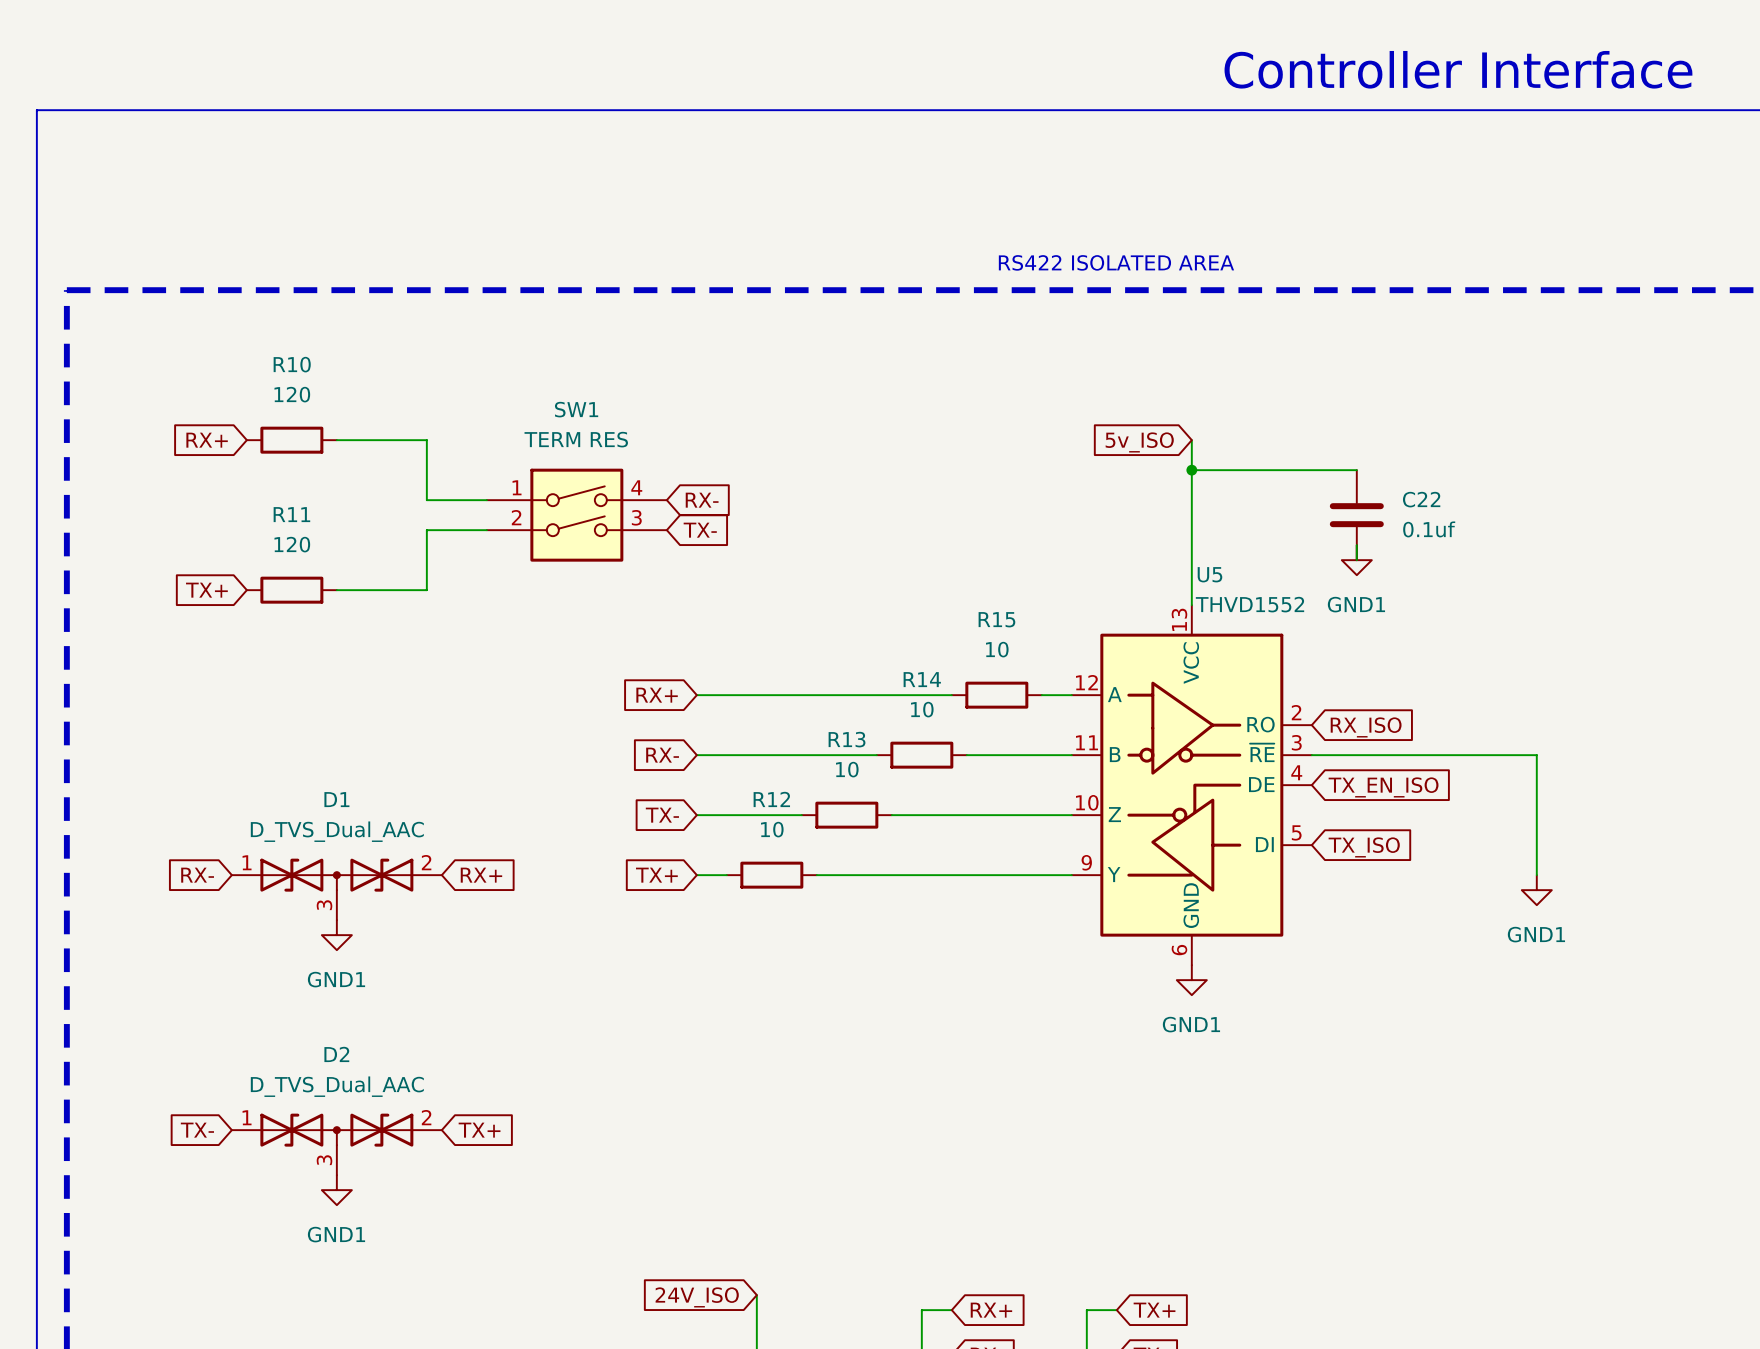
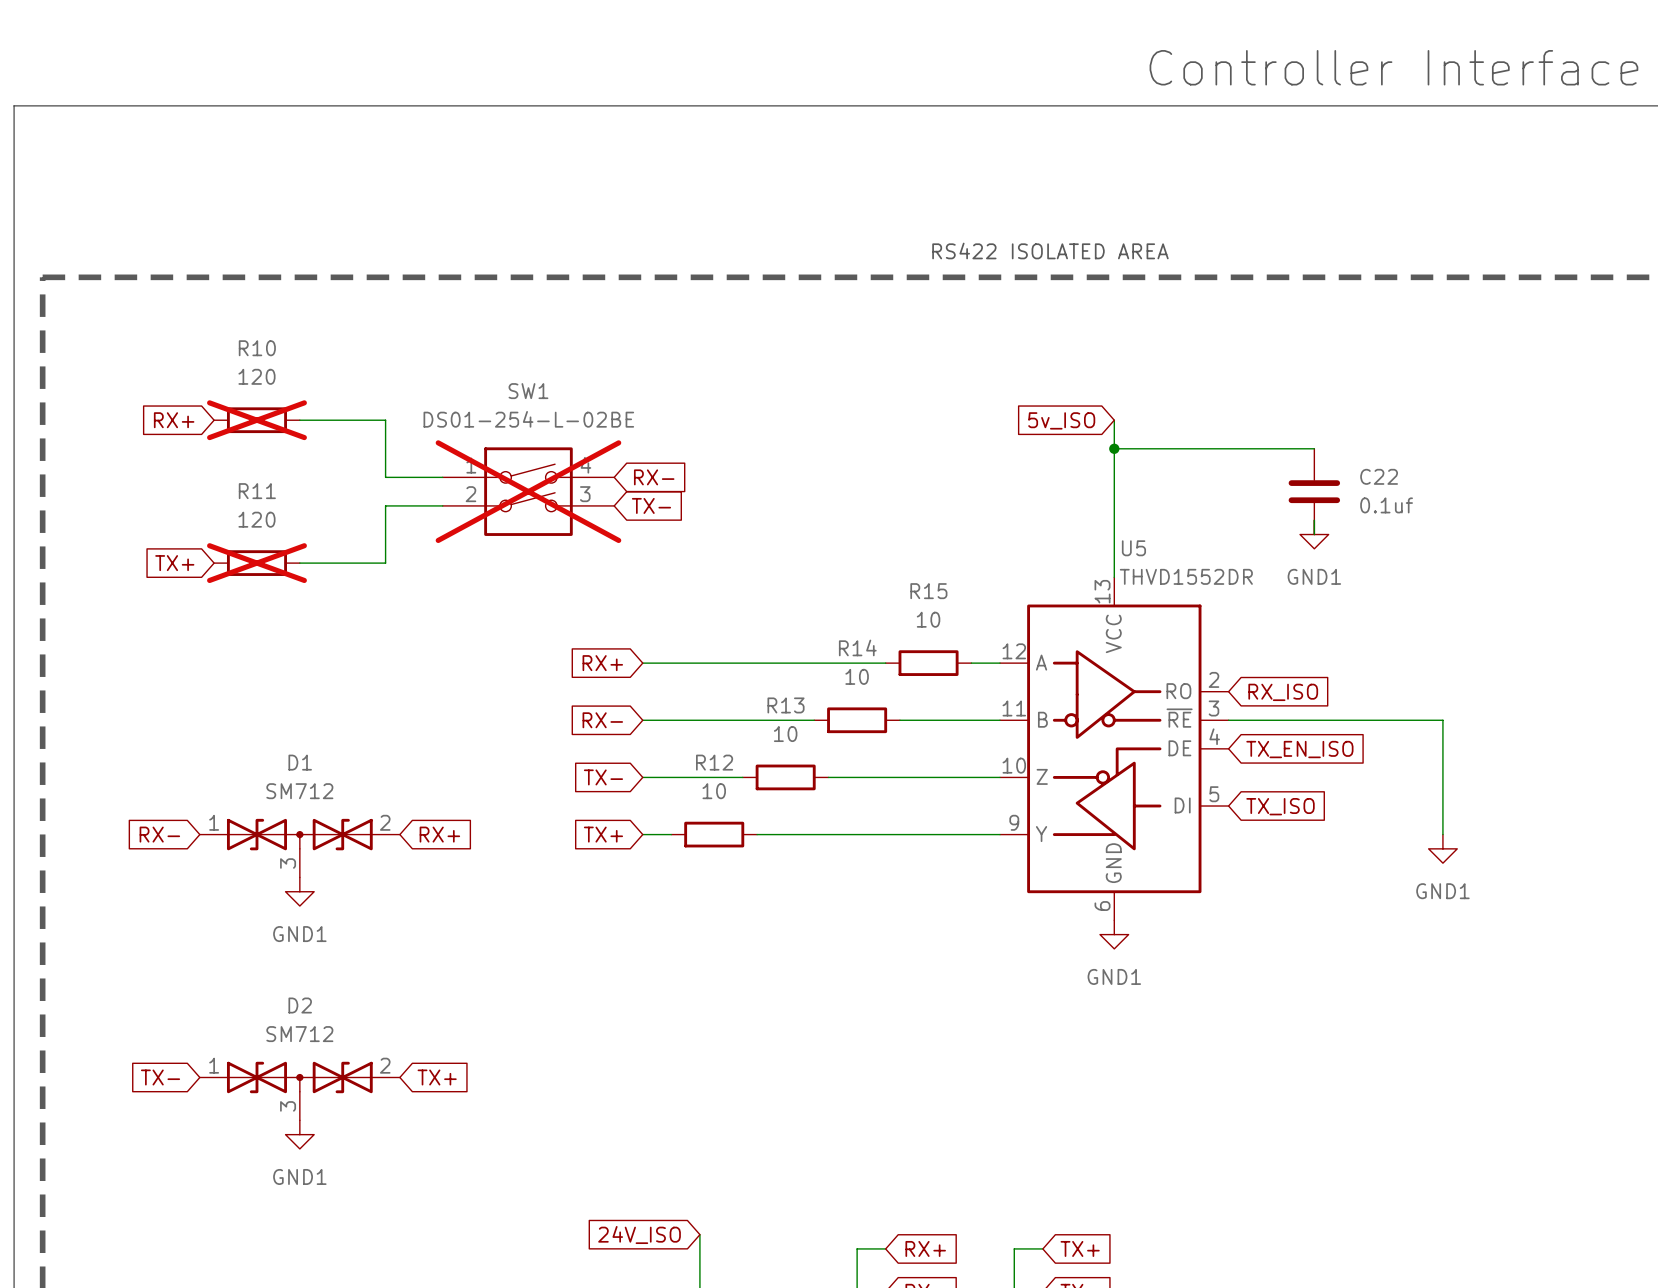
SW1 value: TERM RES (576, 439) -> DS01-254-L-02BE (528, 419)
R10 do-not-place cross: none -> (256, 420)
wire: none -> (1271, 448) (1314, 448)
SW1 do-not-place cross: none -> (528, 491)
C22 position: (1356, 515) -> (1314, 491)
wire: (1356, 545) (1356, 560) -> (1314, 520) (1314, 534)
power symbol position: GND1 (1356, 560) -> GND1 (1314, 534)
R11 do-not-place cross: none -> (256, 563)
U5 value: THVD1552 (1250, 604) -> THVD1552DR (1186, 576)
D1 value: D_TVS_Dual_AAC (337, 831) -> SM712 (299, 791)
D2 value: D_TVS_Dual_AAC (337, 1086) -> SM712 (299, 1034)

